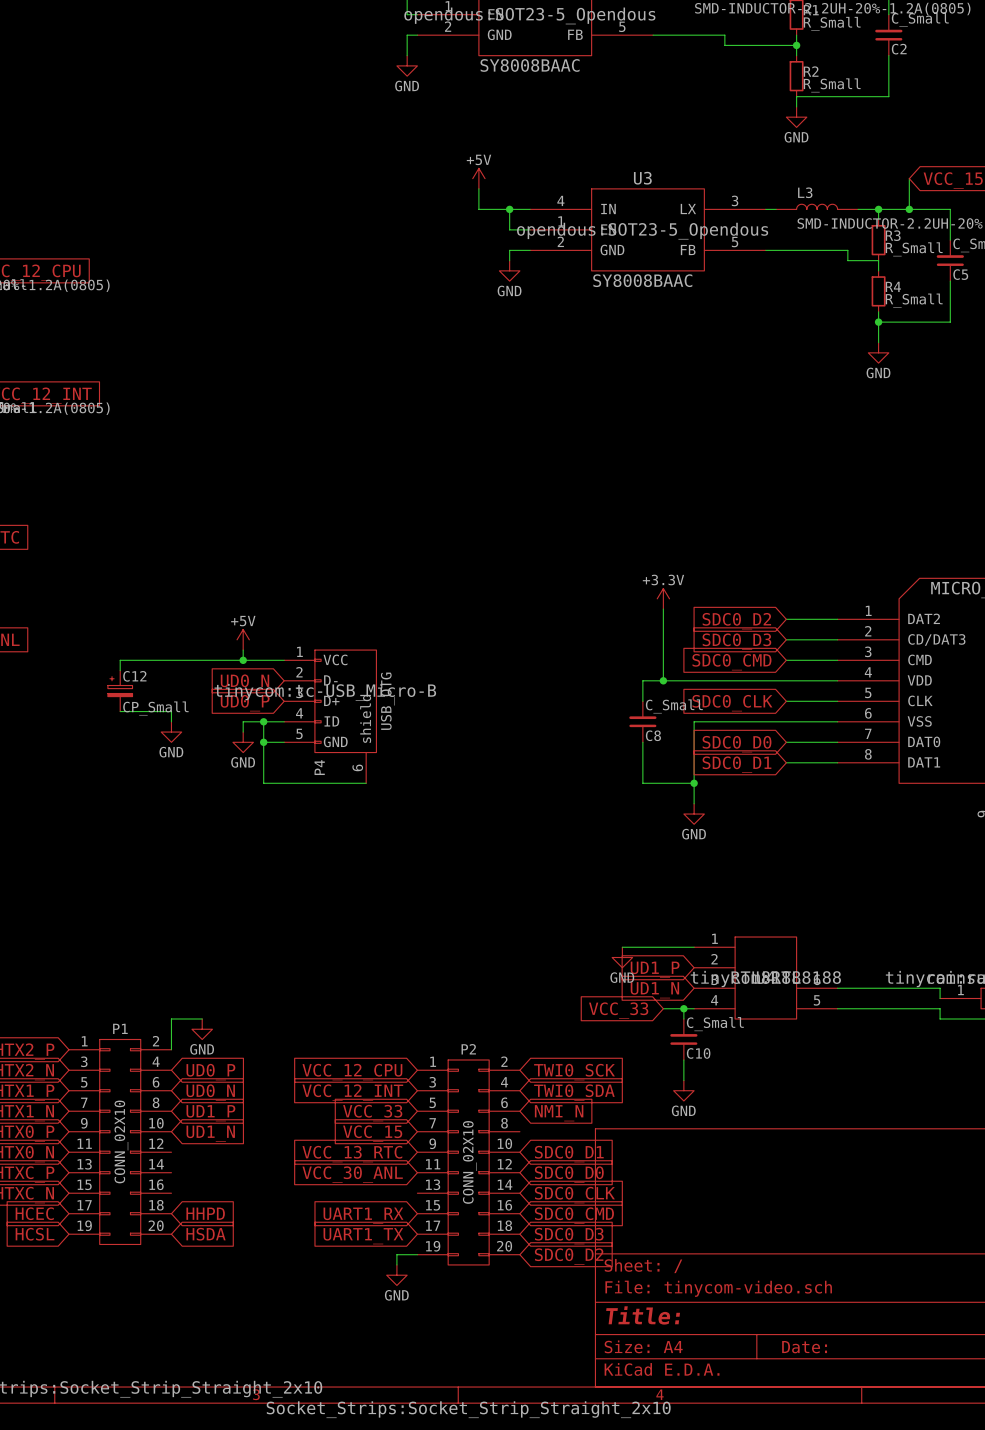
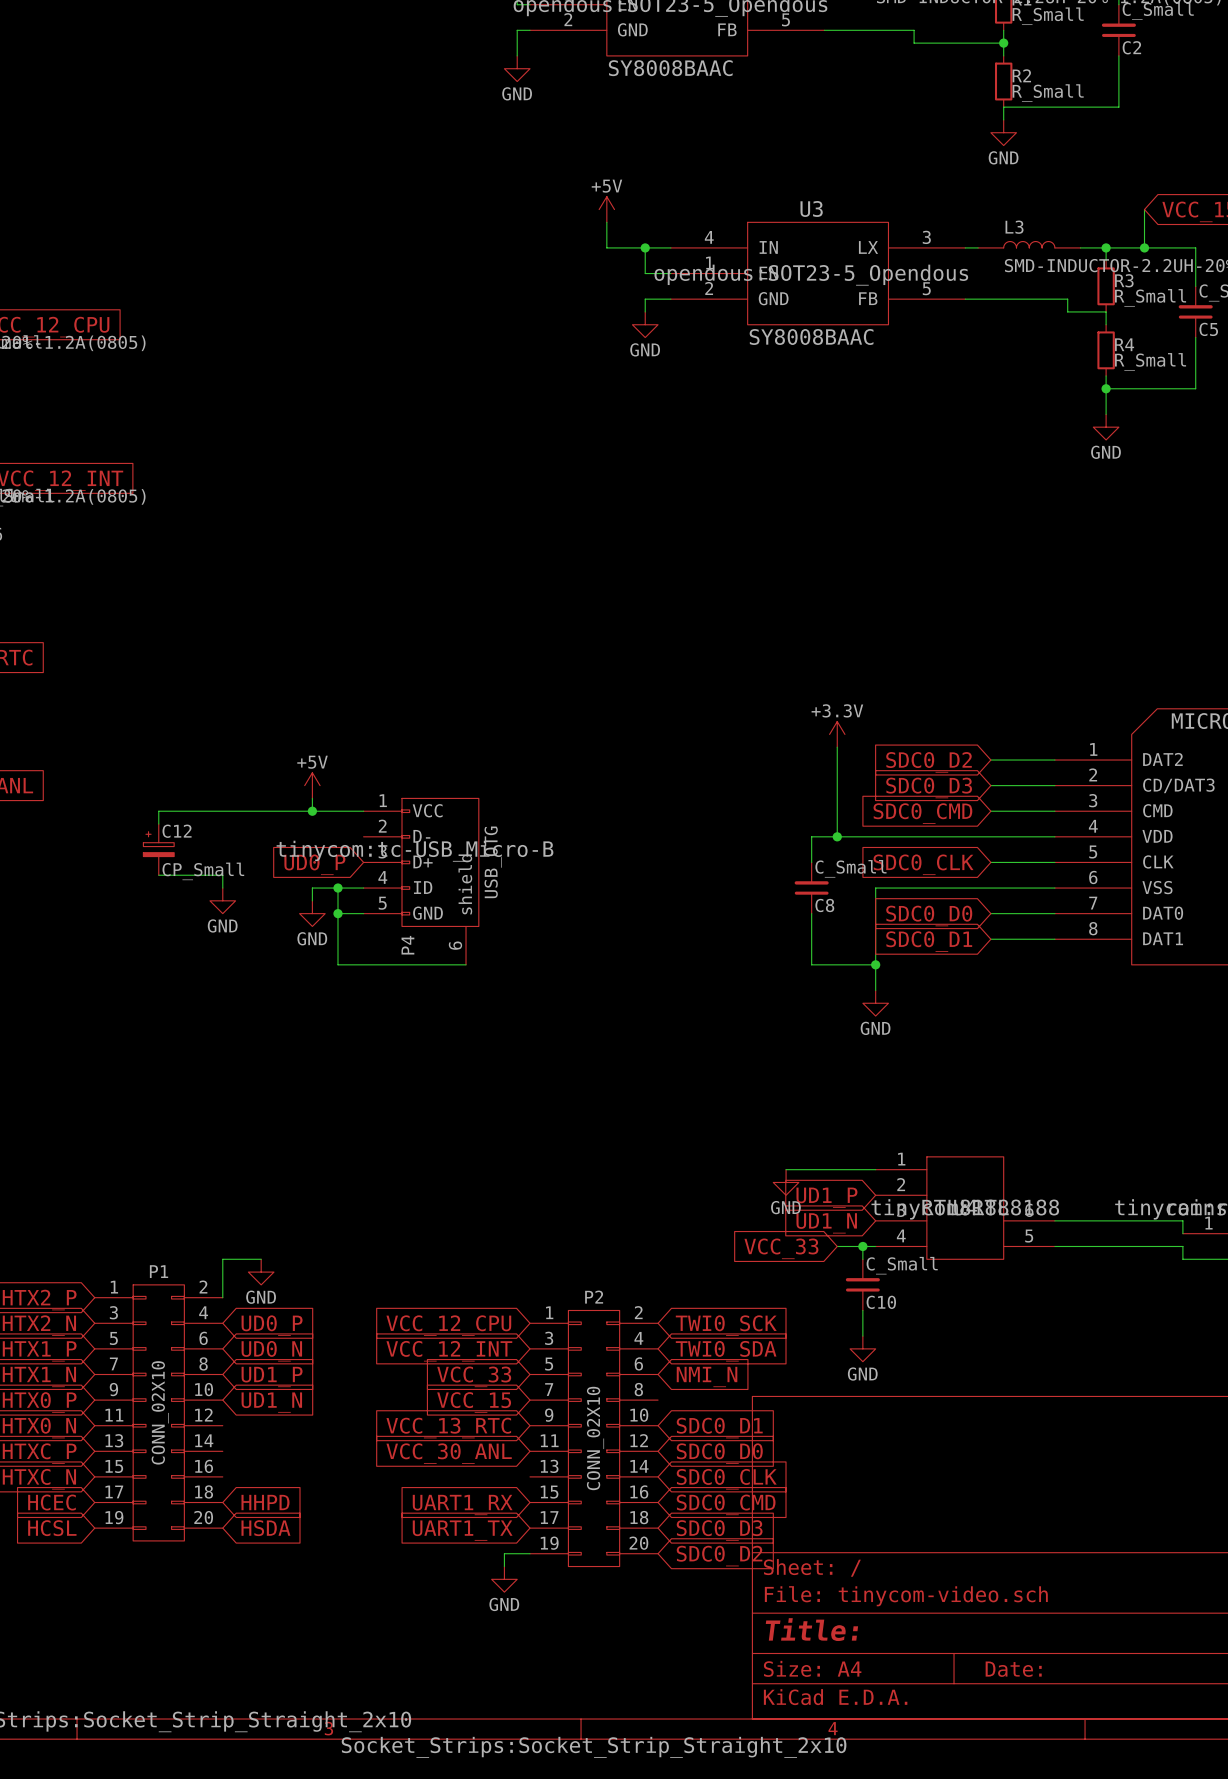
global label: UD0_N (245, 682) -> none

